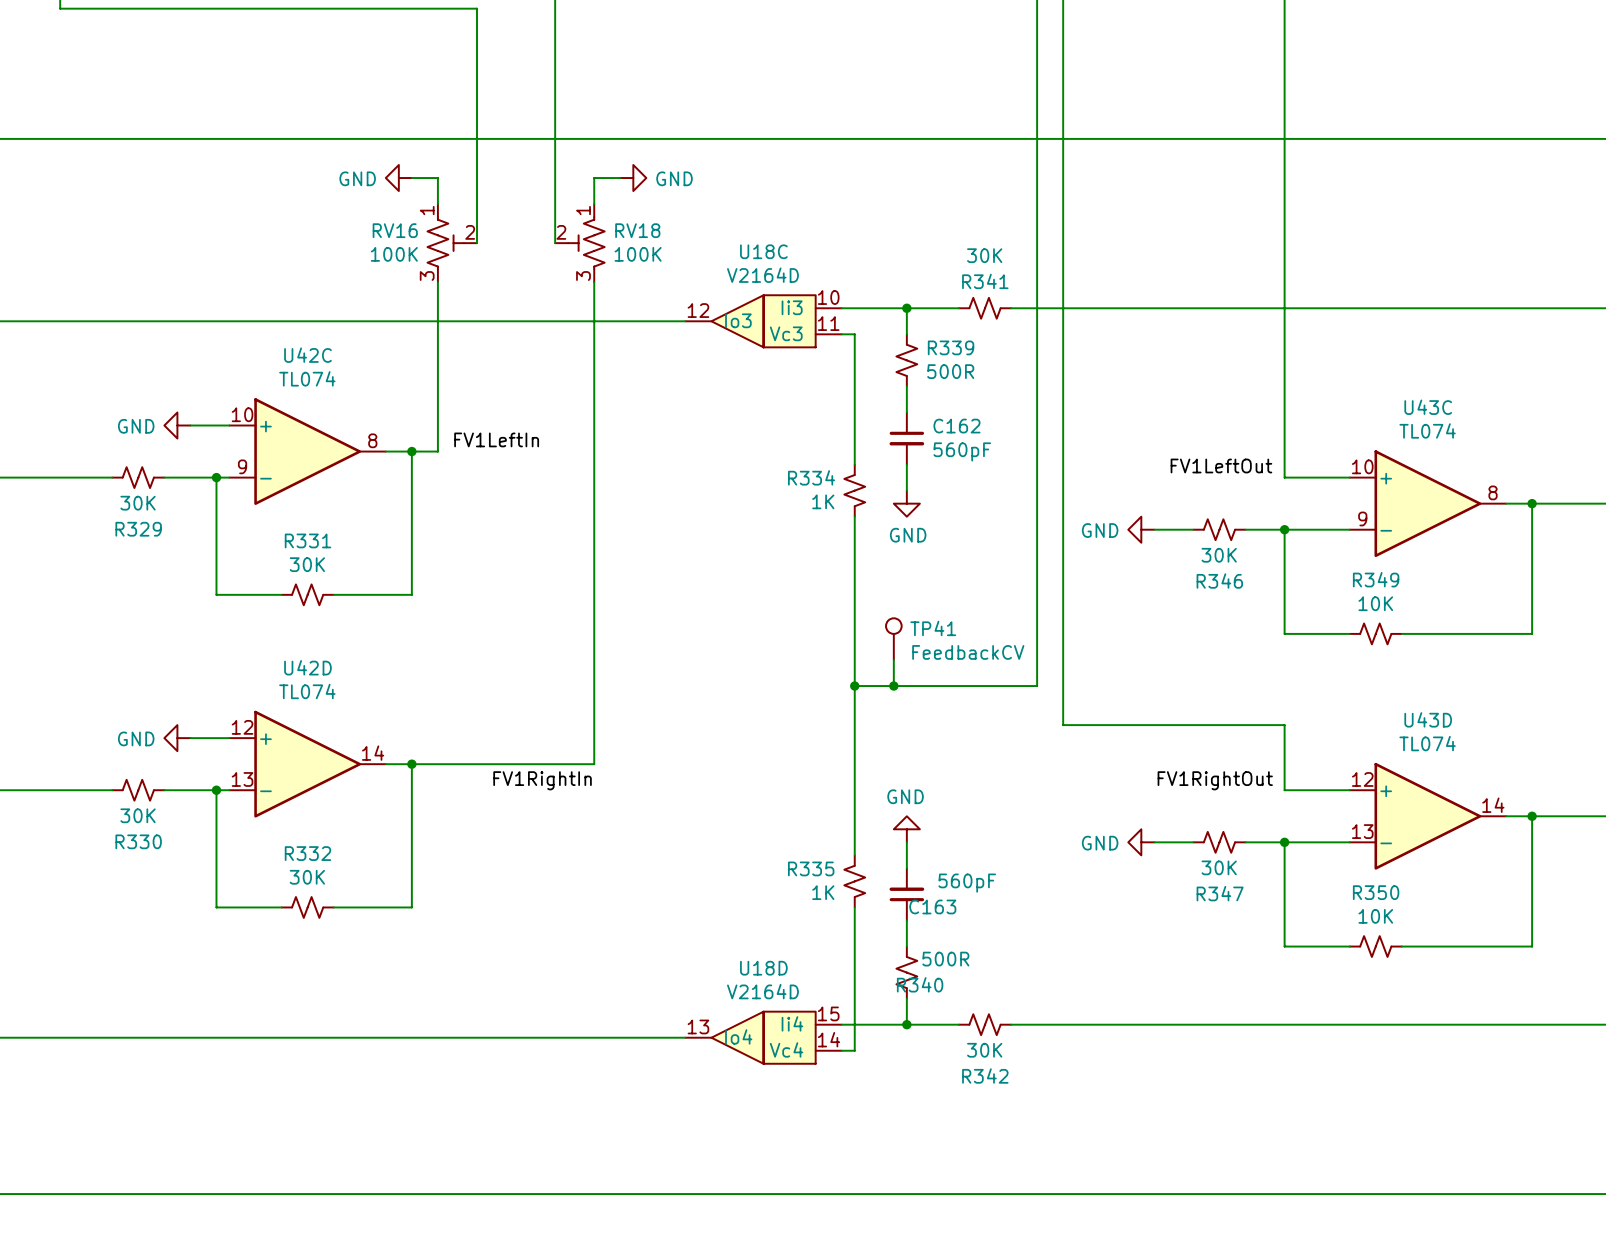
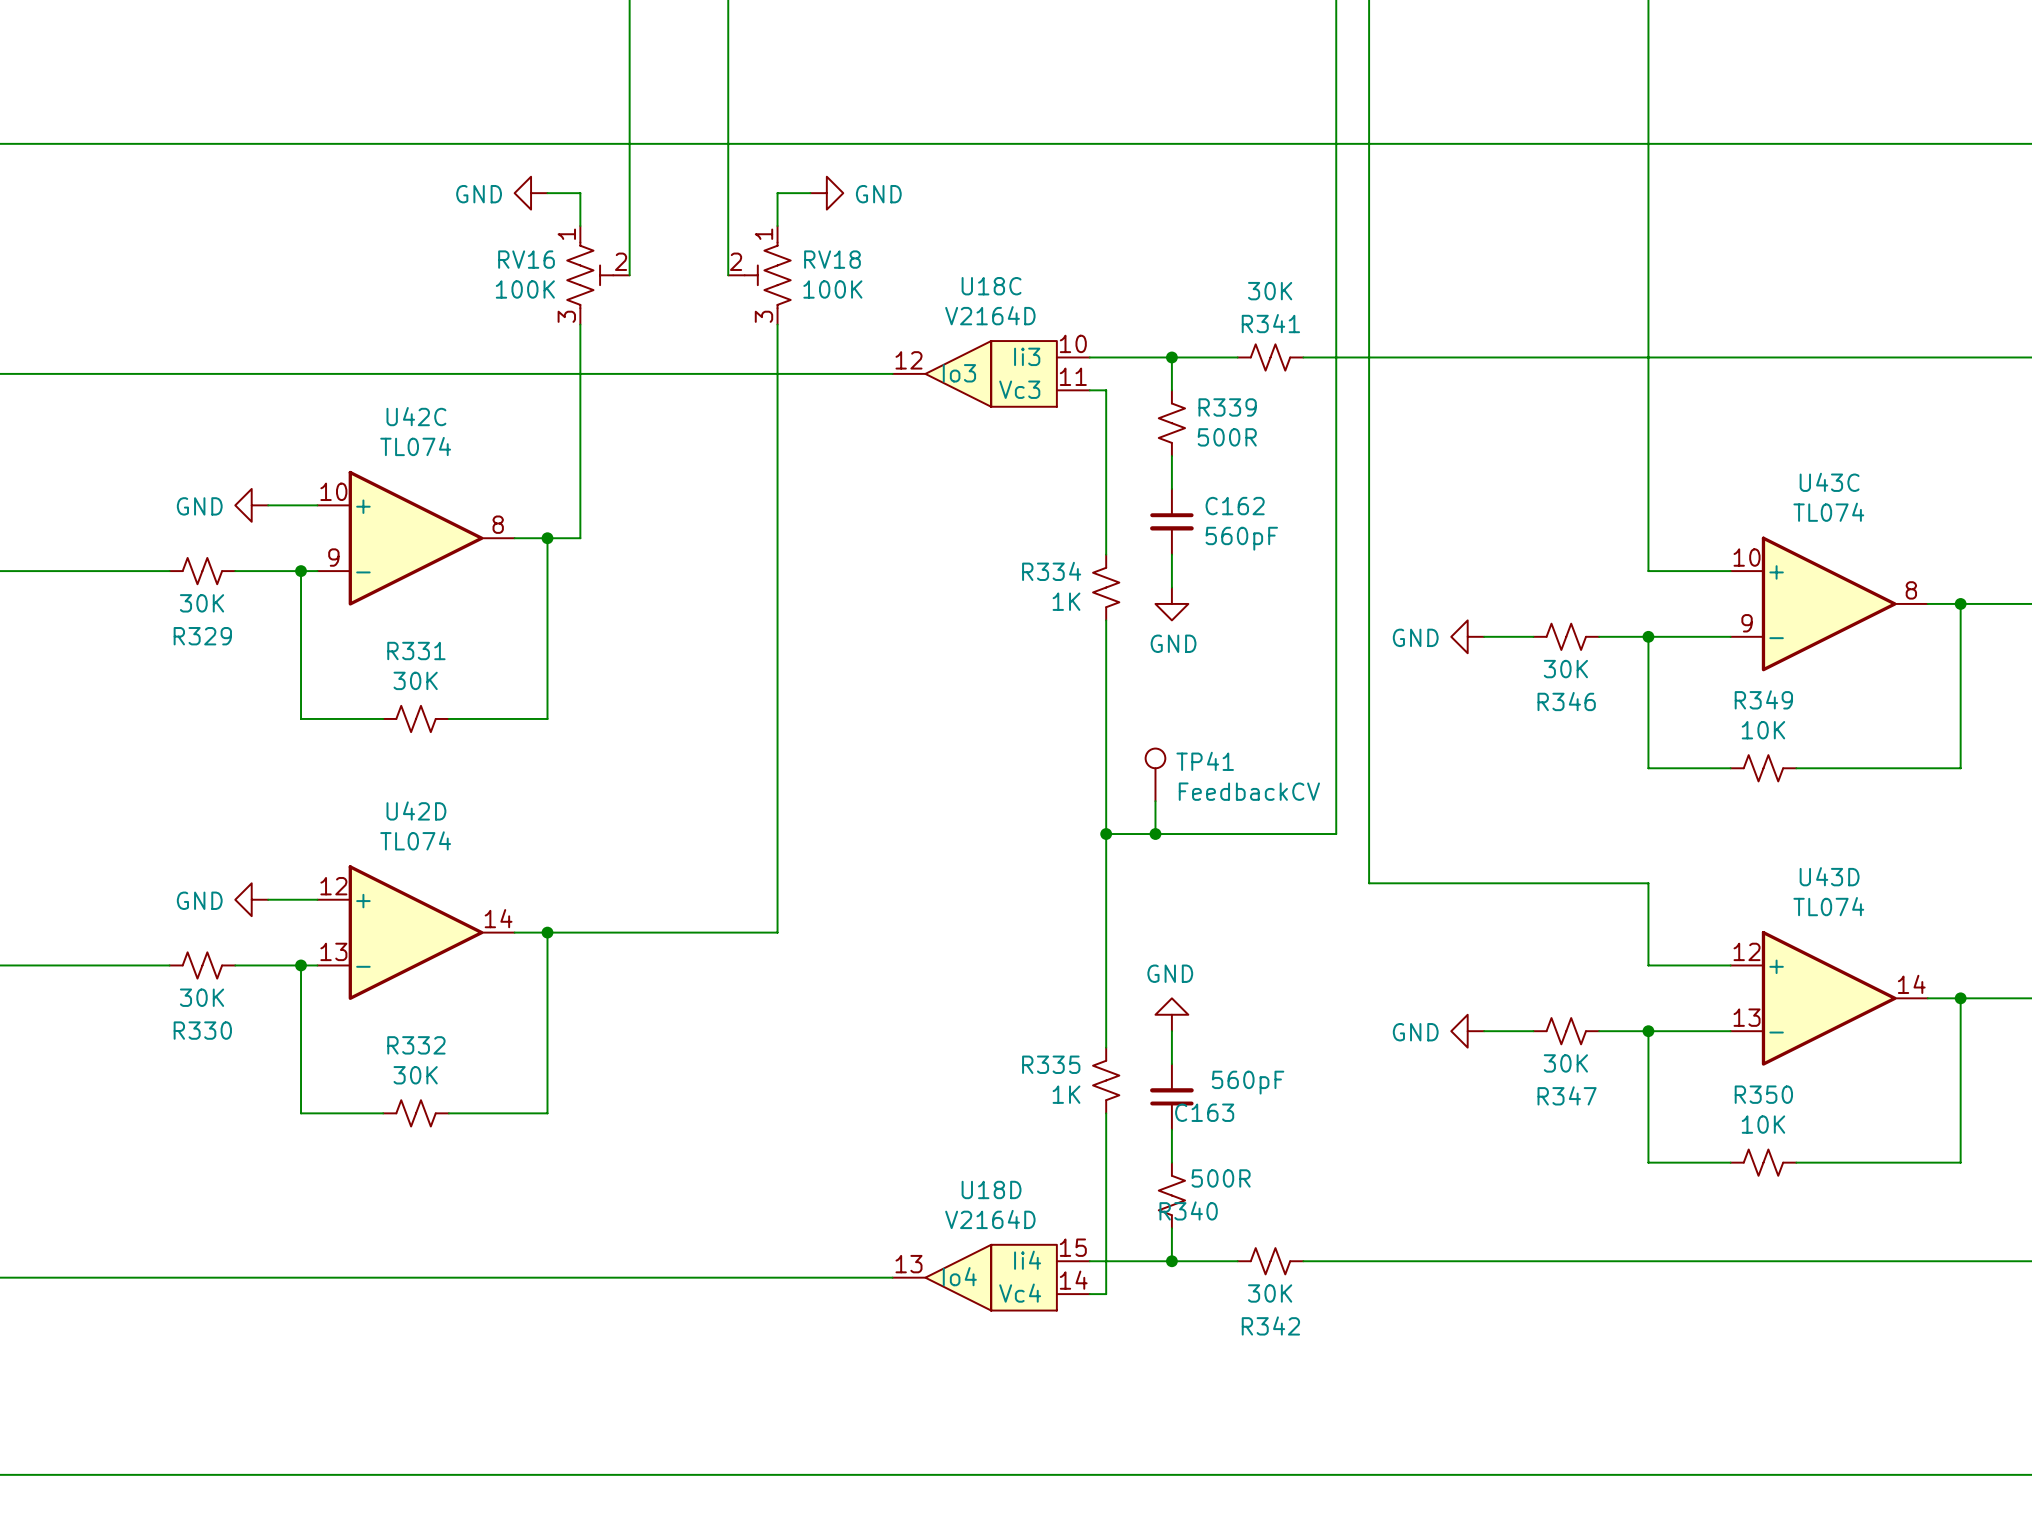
label: FV1LeftIn (496, 439) -> none
label: FV1LeftOut (1221, 465) -> none
label: FV1RightIn (542, 780) -> none
label: FV1RightOut (1215, 780) -> none

